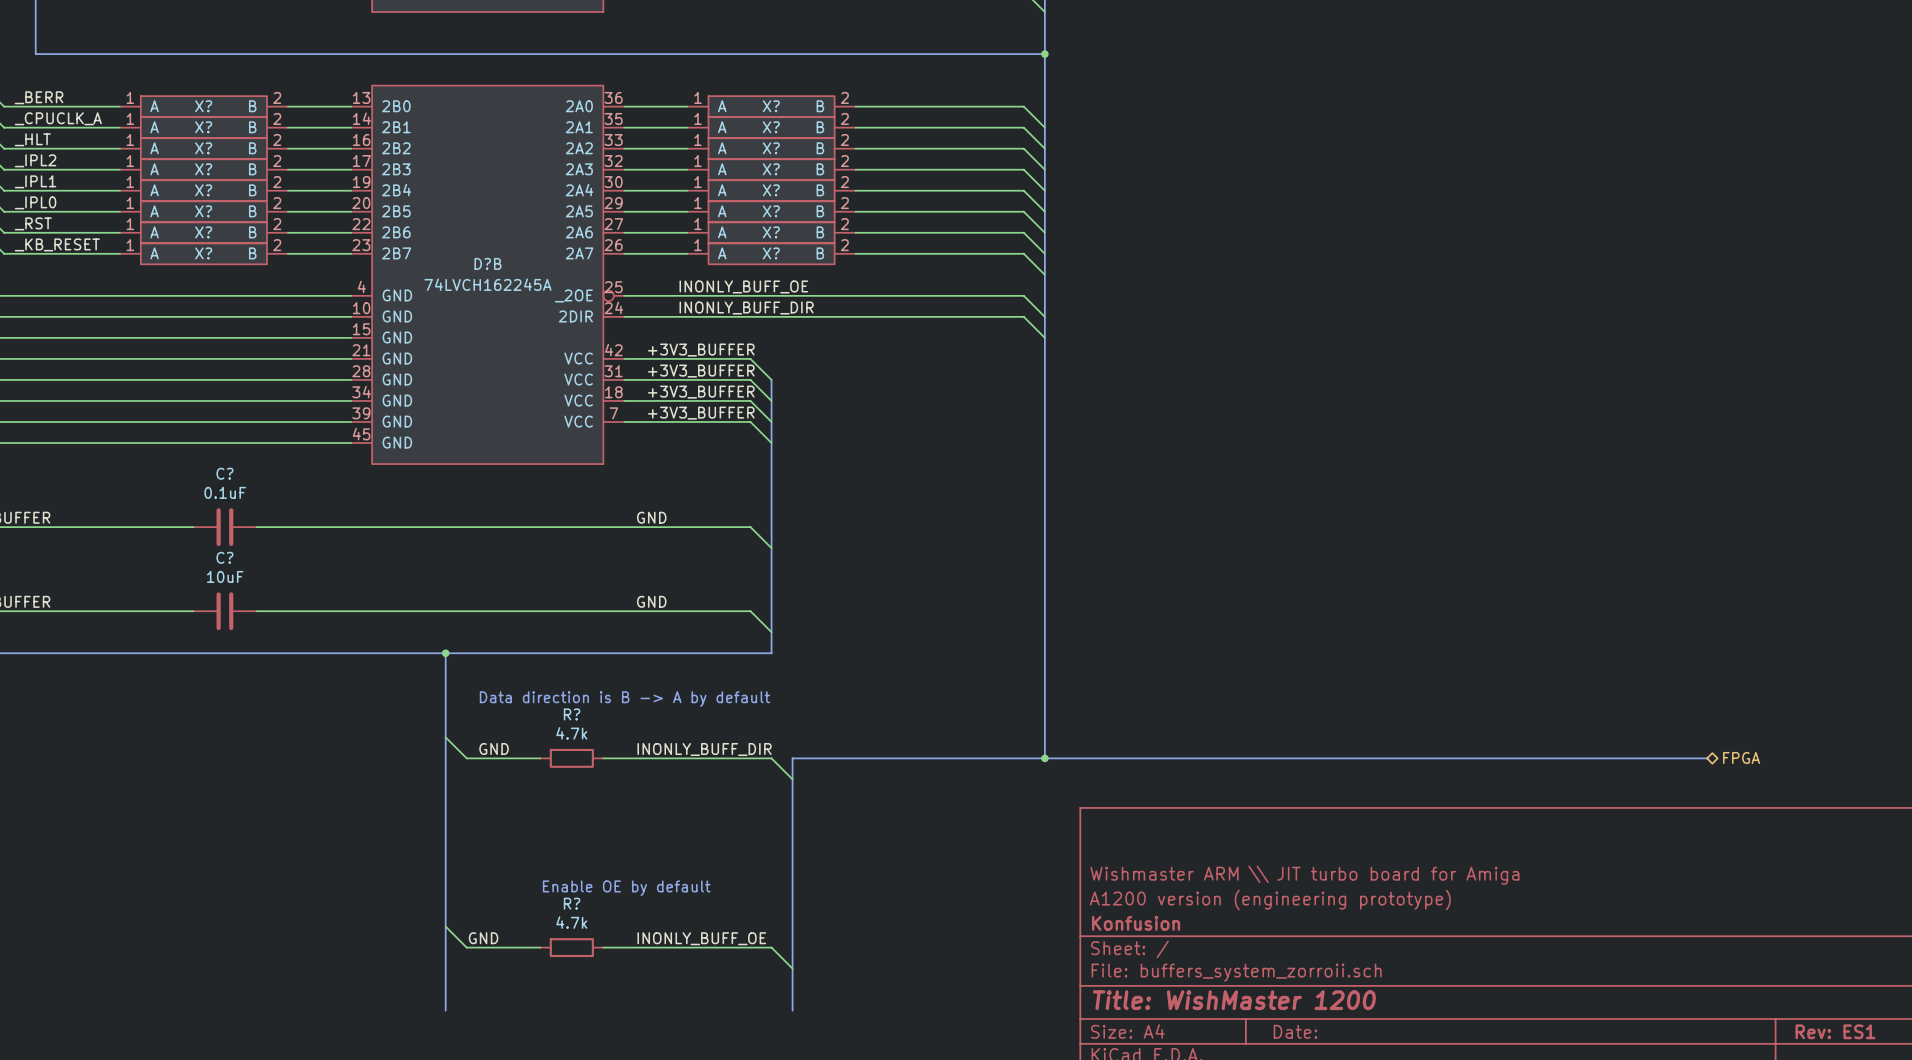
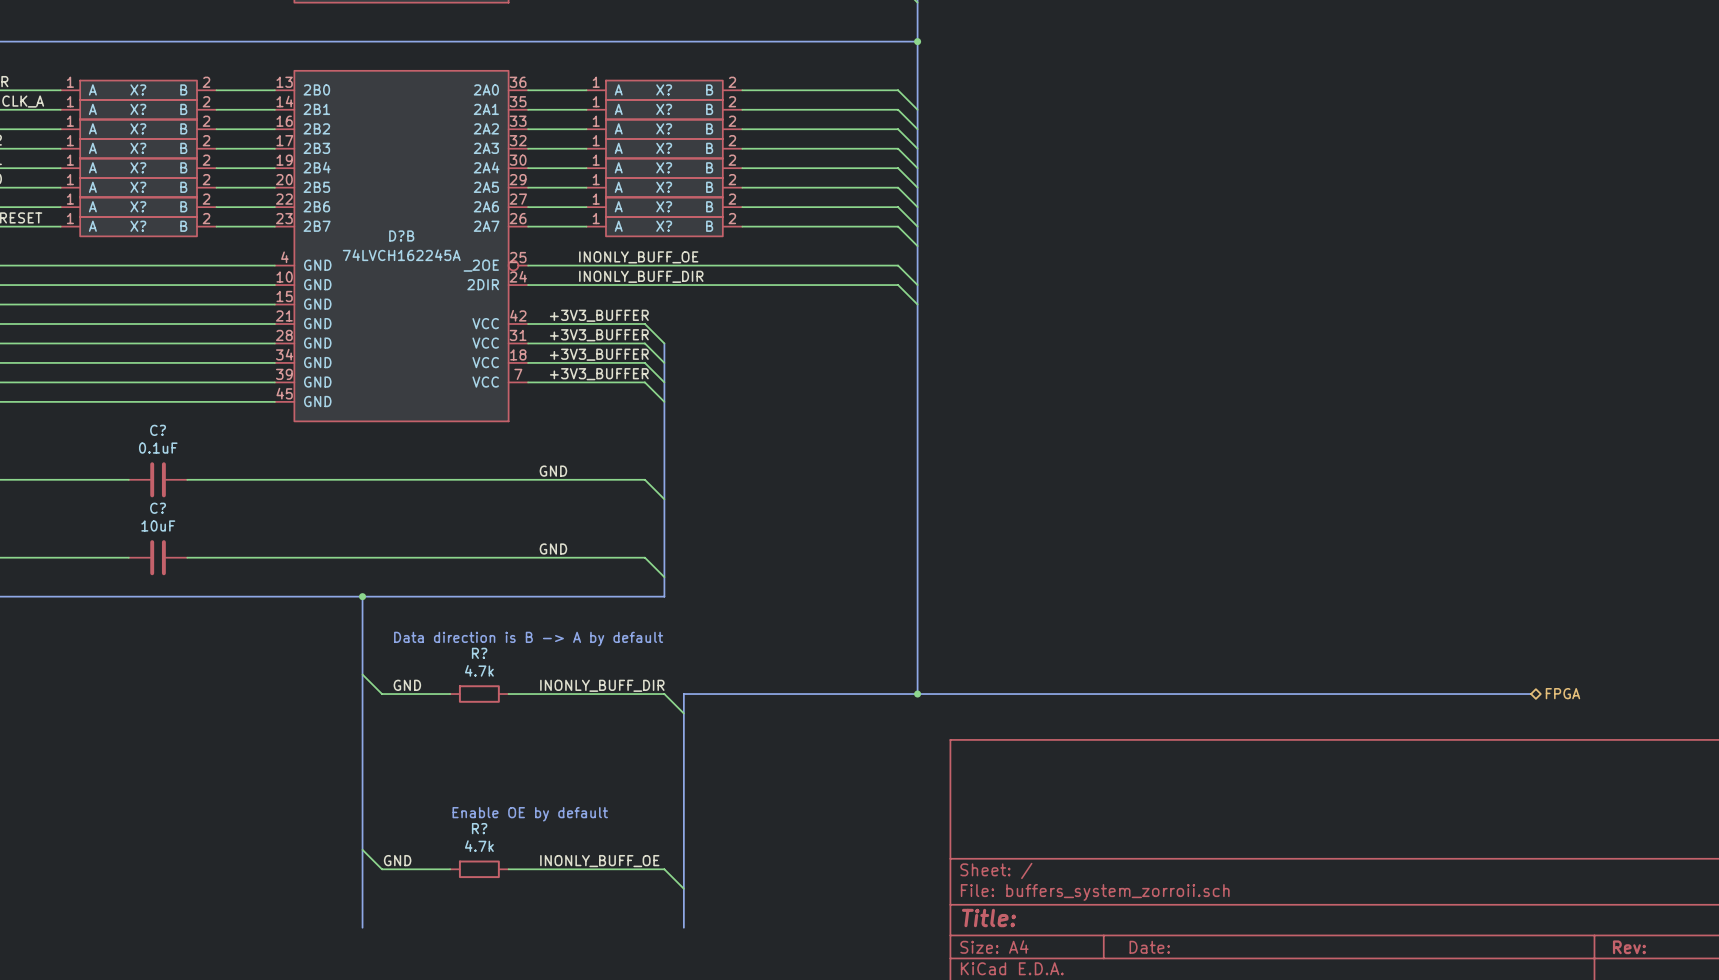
title block: Wishmaster ARM \\ JIT turbo board for Amiga (1304, 875) -> none
title block: A1200 version (engineering prototype) (1270, 900) -> none
title block: Konfusion (1136, 923) -> none
title block: Title: WishMaster 1200 (1234, 1000) -> Title: (988, 918)
title block: Rev: ES1 (1835, 1031) -> Rev: (1629, 947)

